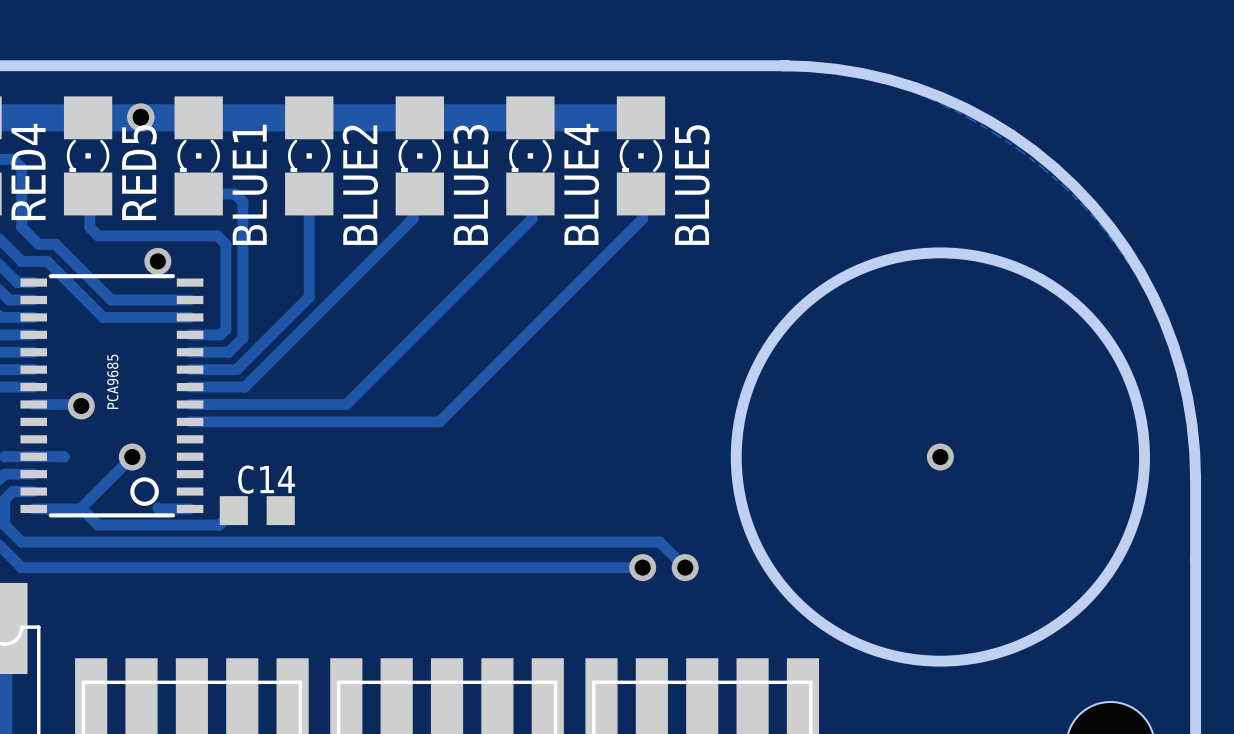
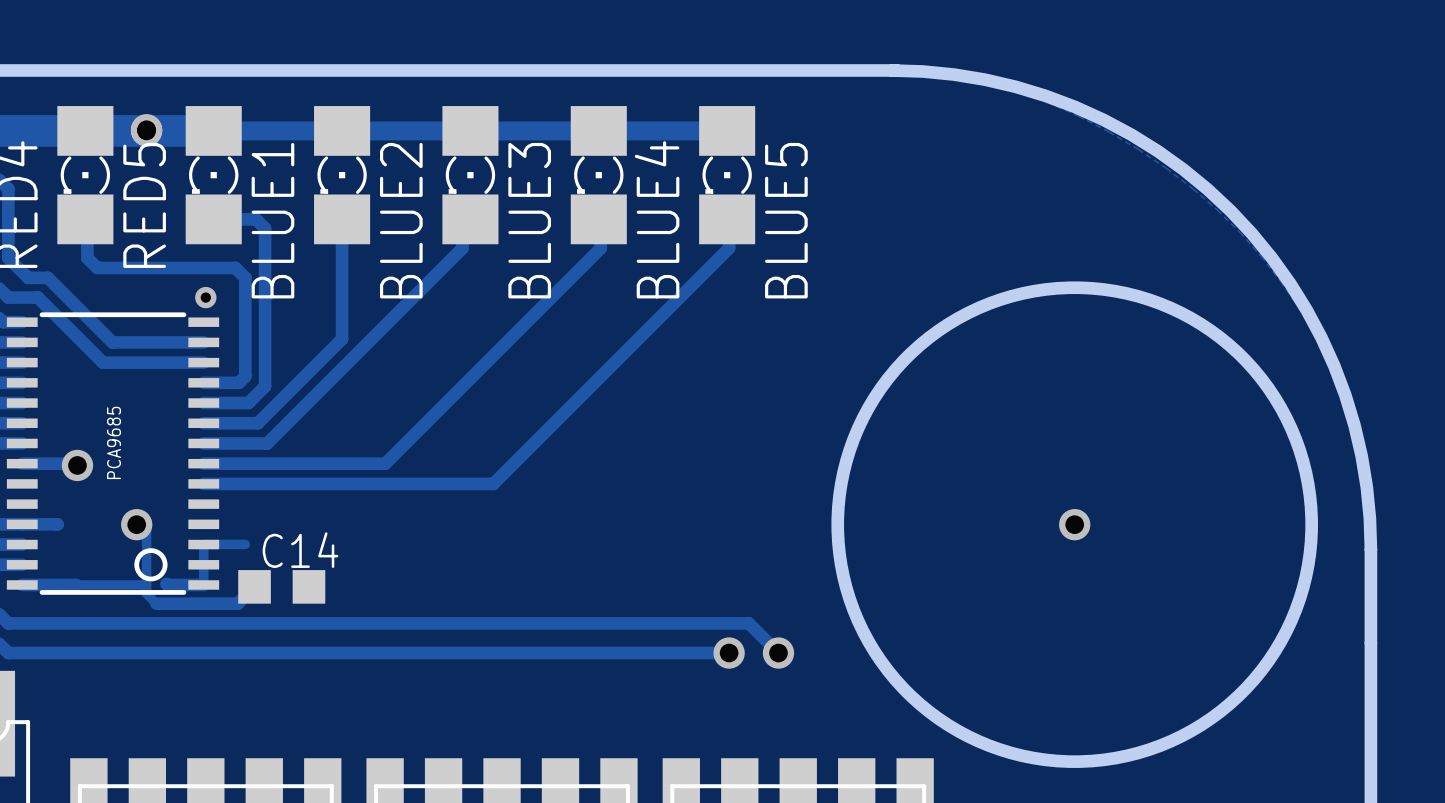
track width: thick (198, 117) (640, 117) -> thin (213, 130) (727, 130)
via: (157, 261) -> none
via: none -> (205, 297)
track: (132, 457) (80, 508) -> (146, 584) (76, 584)
track: none -> (245, 544) (205, 544) (203, 546) (203, 584)
track: (81, 508) (98, 525) (149, 525) -> (146, 524) (146, 593) (156, 603)

